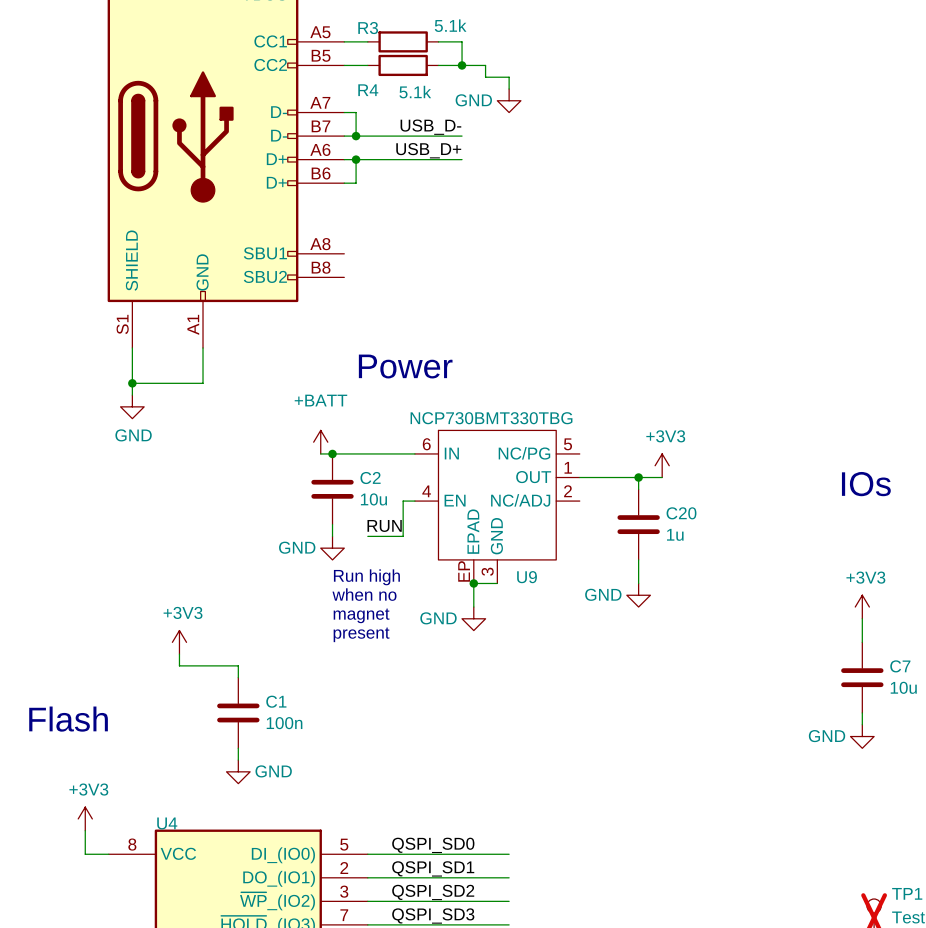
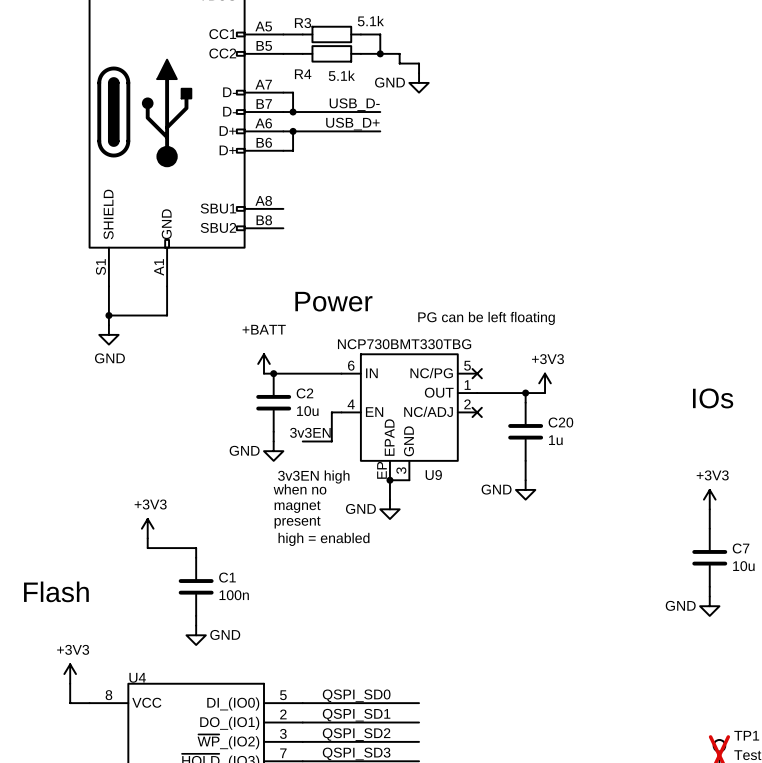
text: none -> PG can be left floating (486, 318)
no-connect mark: none -> (477, 373)
no-connect mark: none -> (477, 412)
label: RUN (384, 525) -> 3v3EN (310, 432)
text: Run high (366, 577) -> 3v3EN high (313, 477)
text: none -> high = enabled (324, 539)

